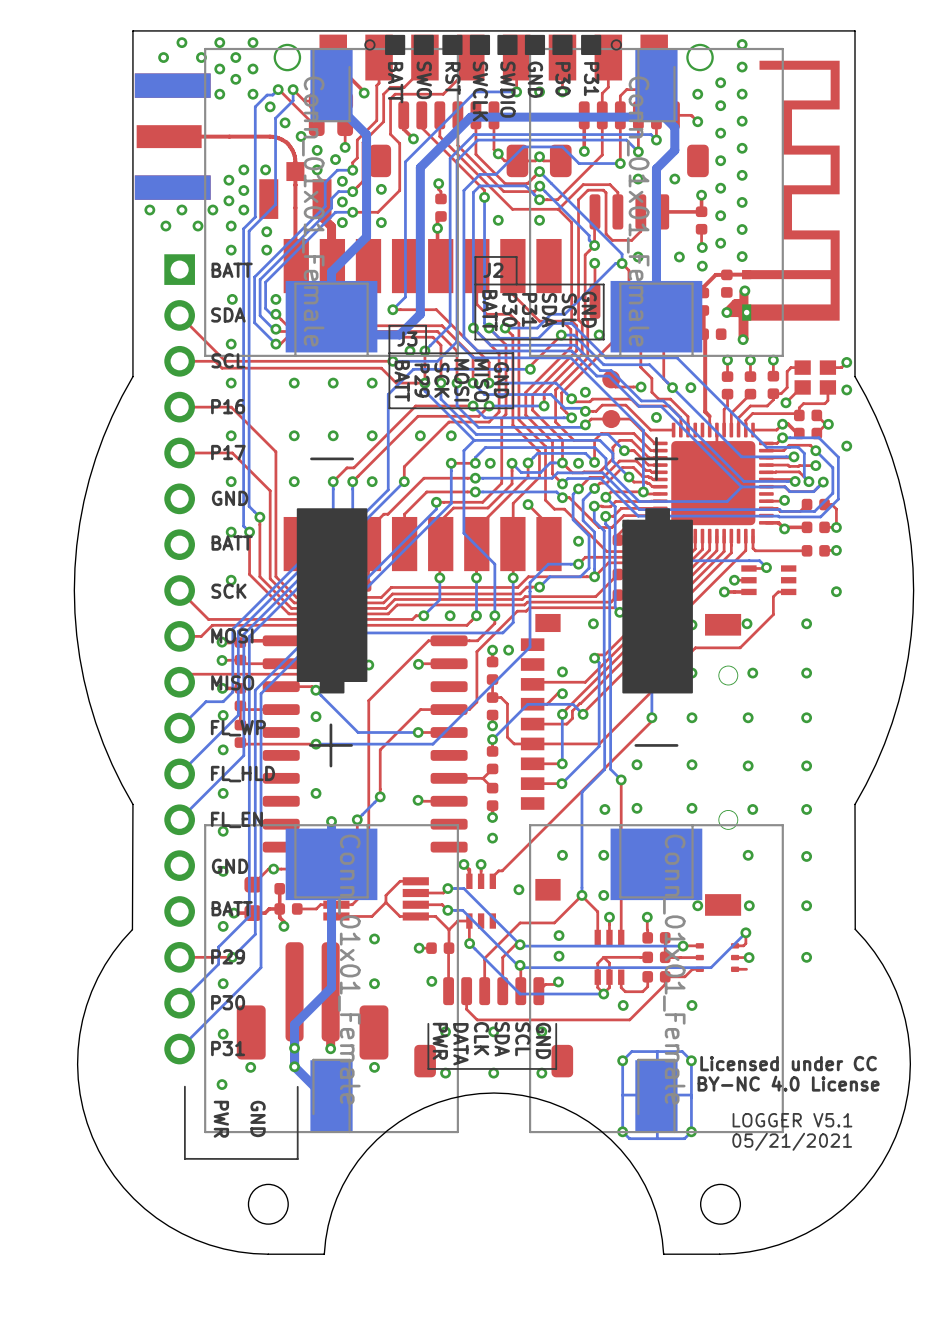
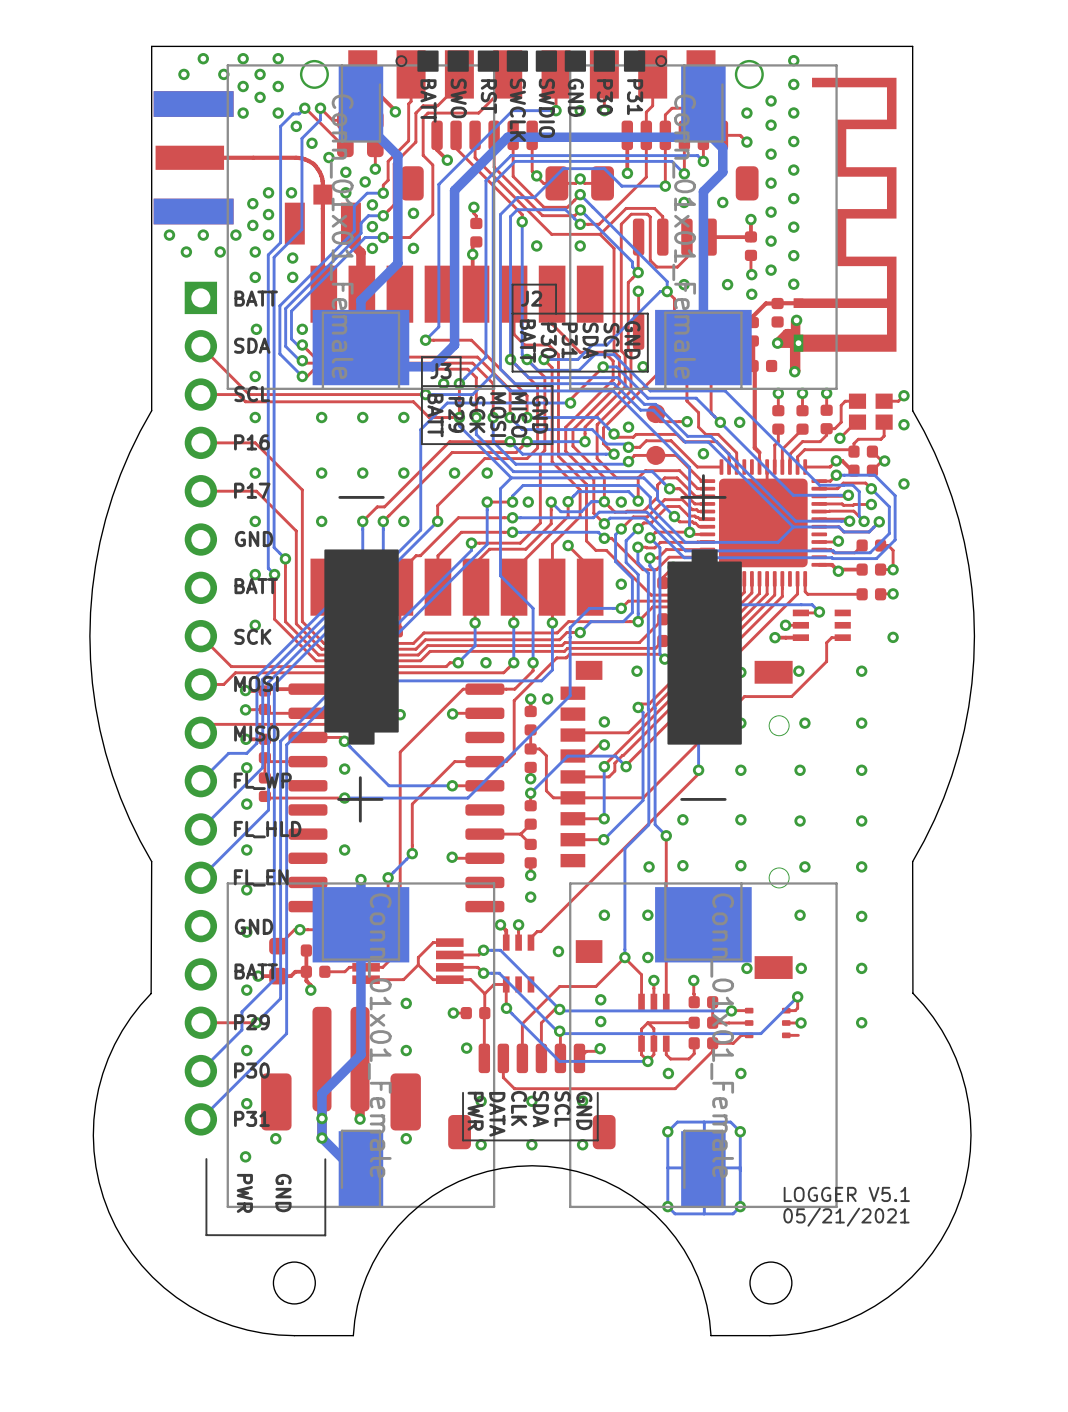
text: Licensed under CC (788, 1063) -> none
text: BY-NC 4.0 License (788, 1083) -> none

